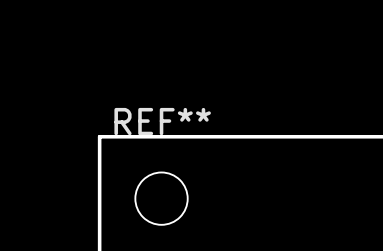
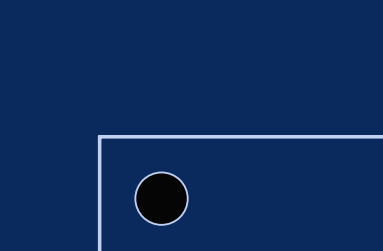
REF** name: REF** (162, 121) -> none

